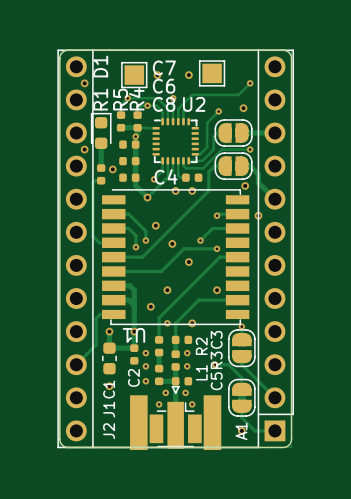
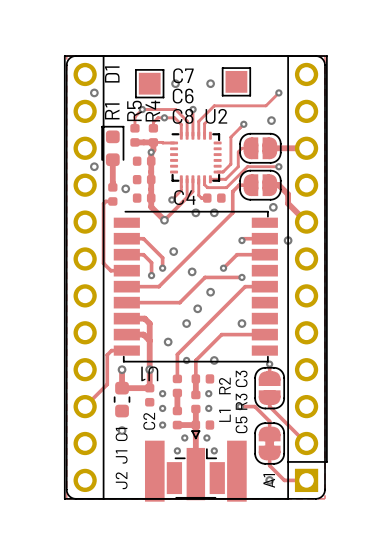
via: none -> (197, 308)

